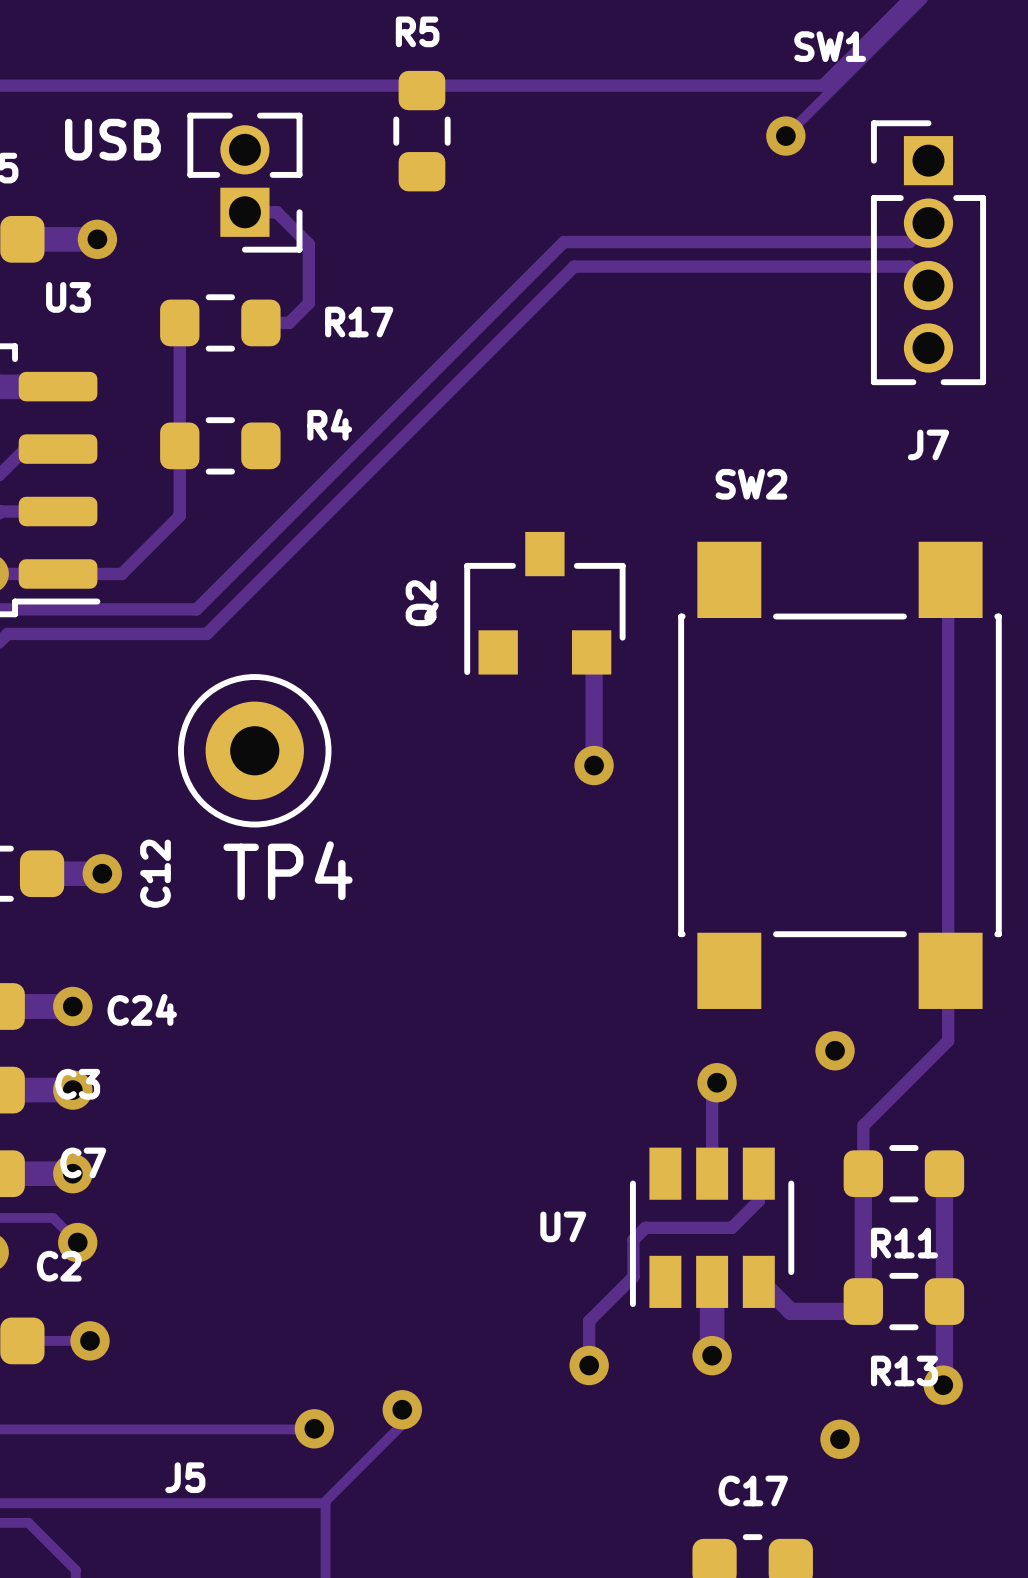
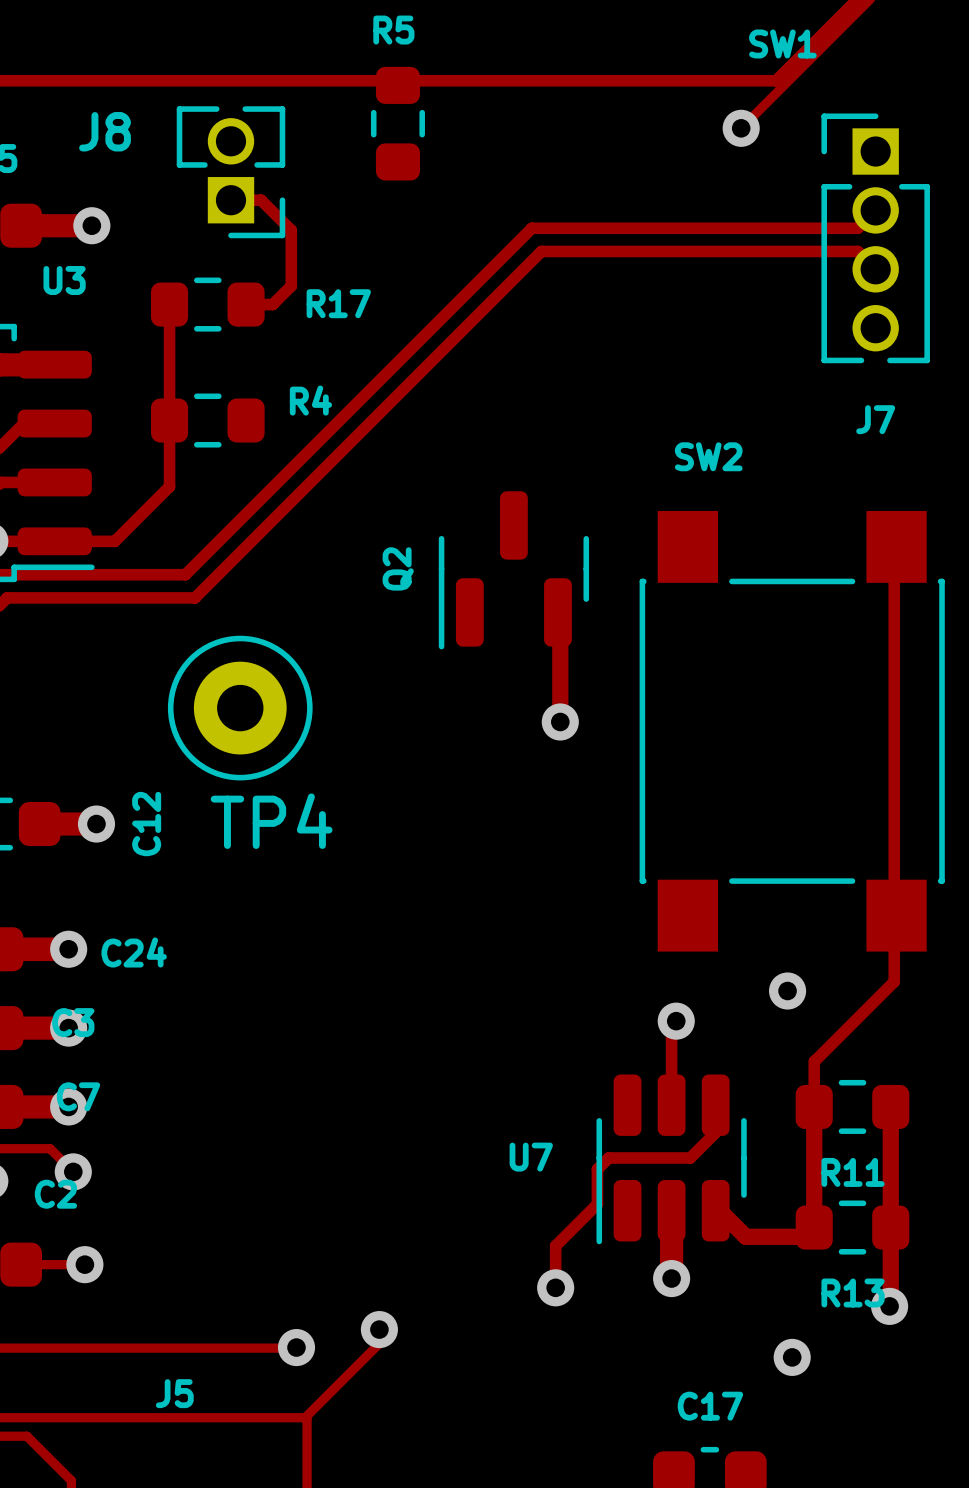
USB name: USB (112, 139) -> J8 (105, 131)
Q2 footprint: [464, 531, 626, 676] -> [438, 491, 590, 650]
U7 footprint: [629, 1147, 795, 1308] -> [596, 1074, 747, 1245]

